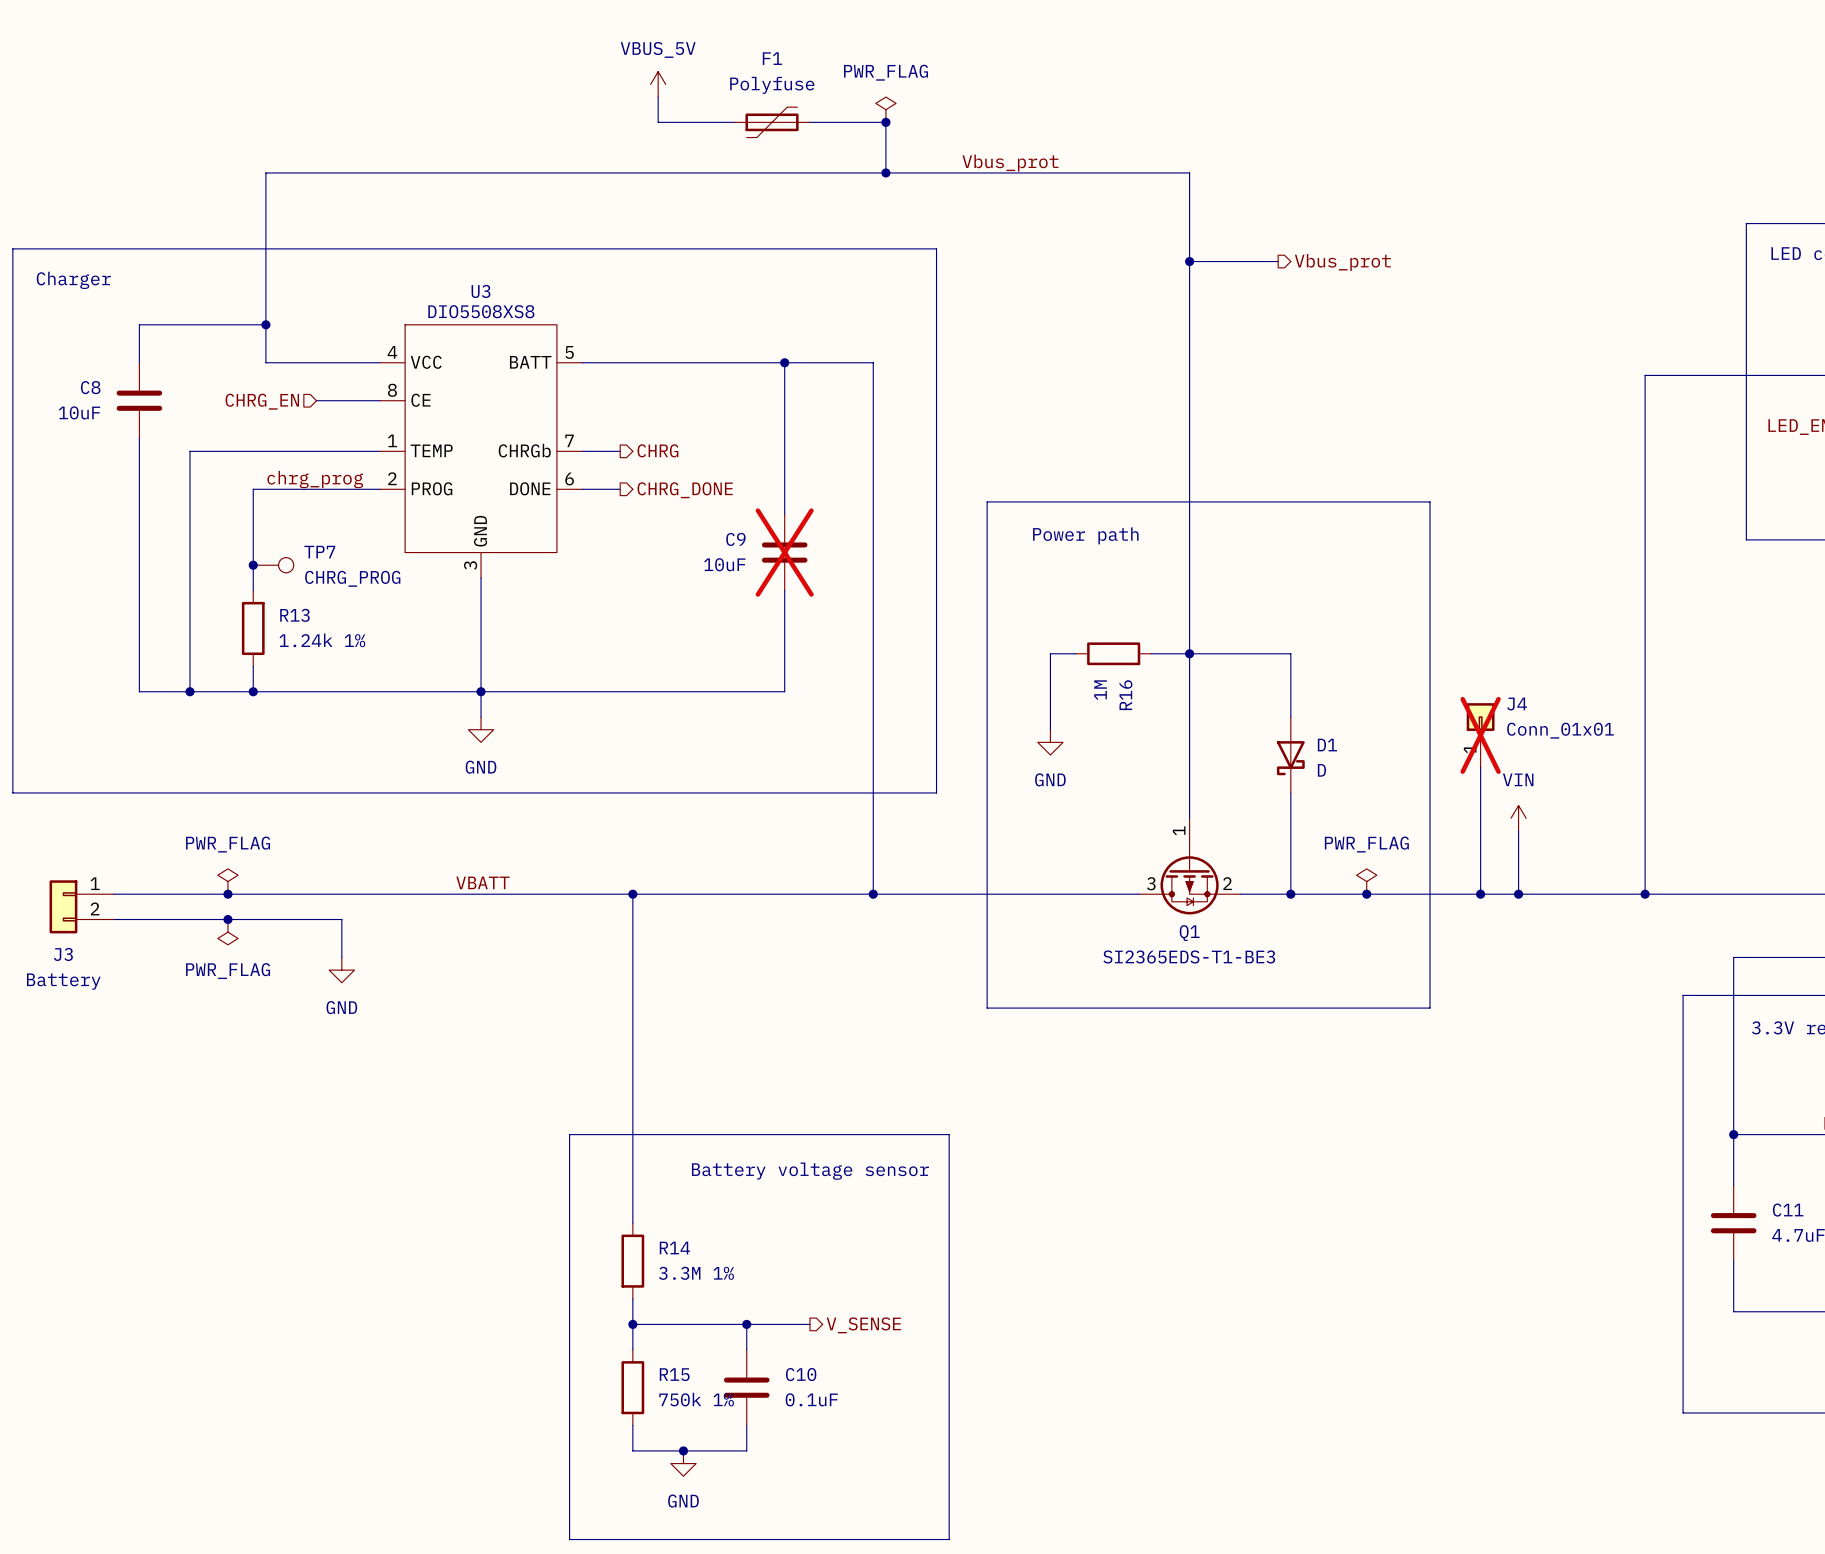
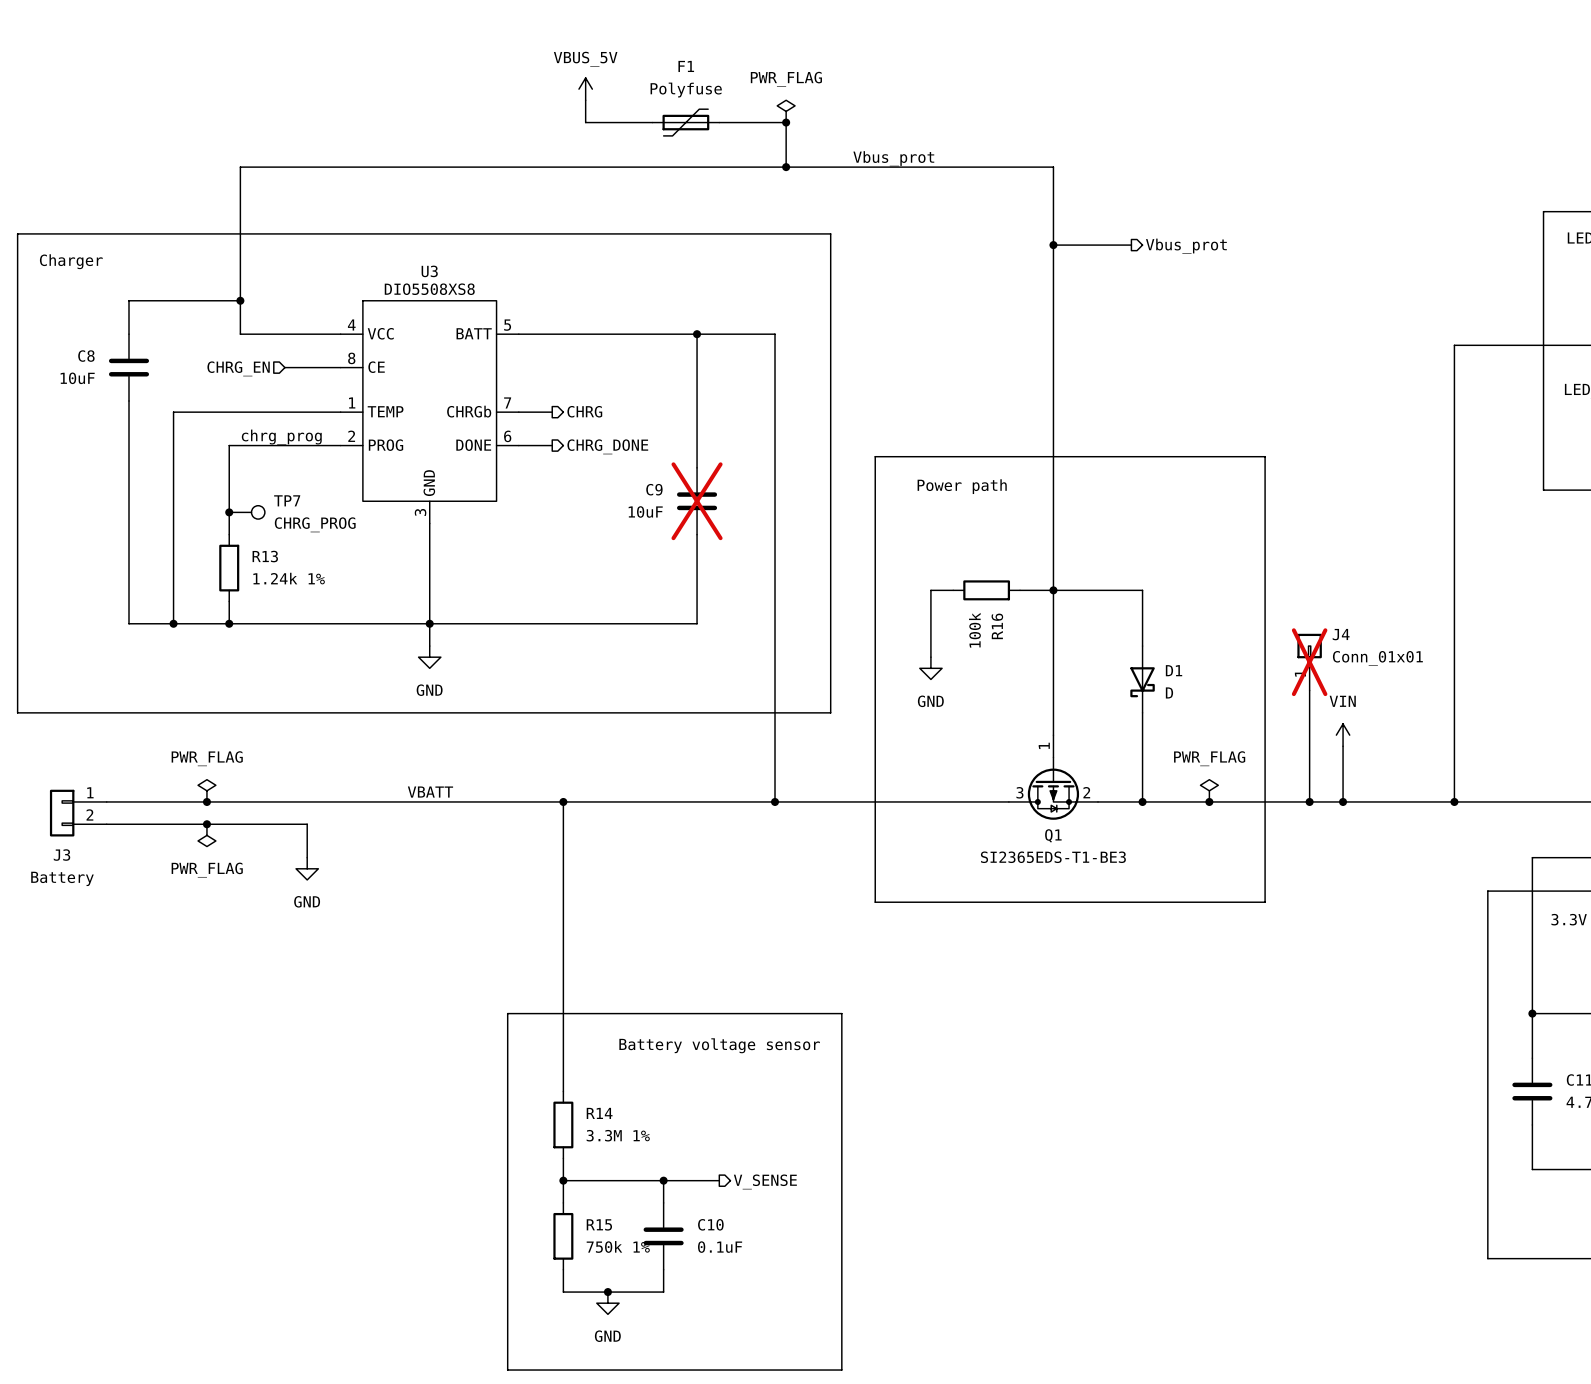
R16 value: 1M (1100, 690) -> 100k (974, 630)

